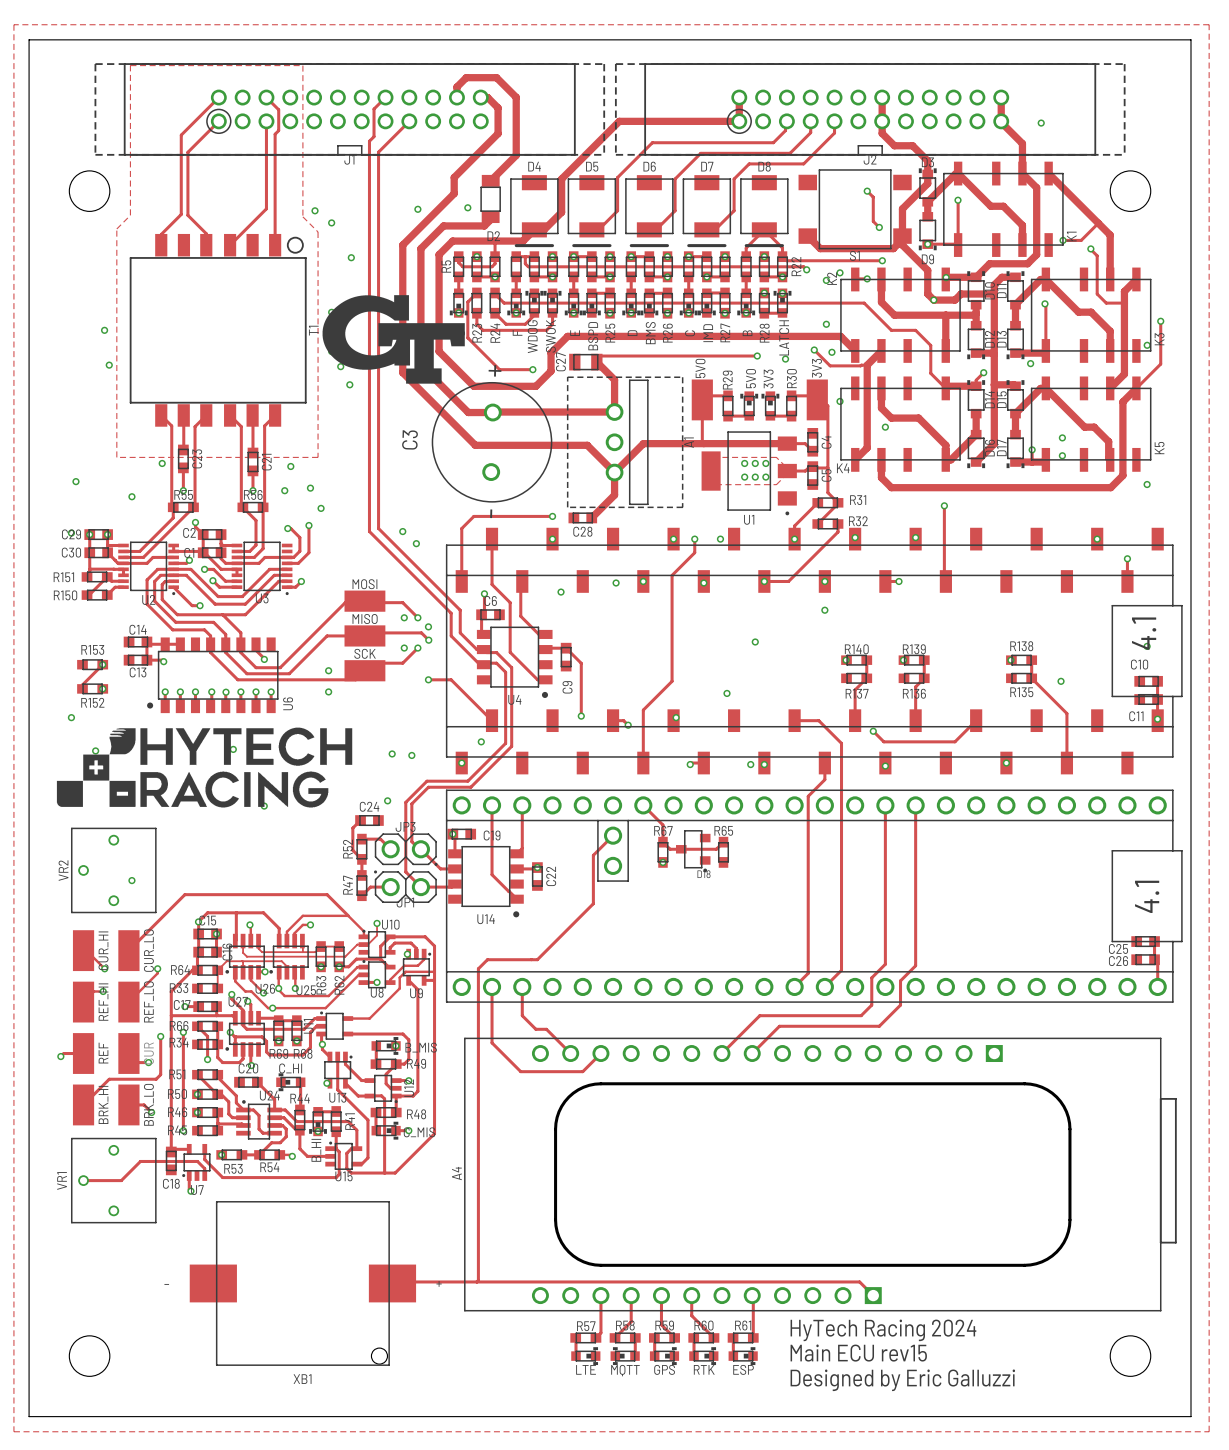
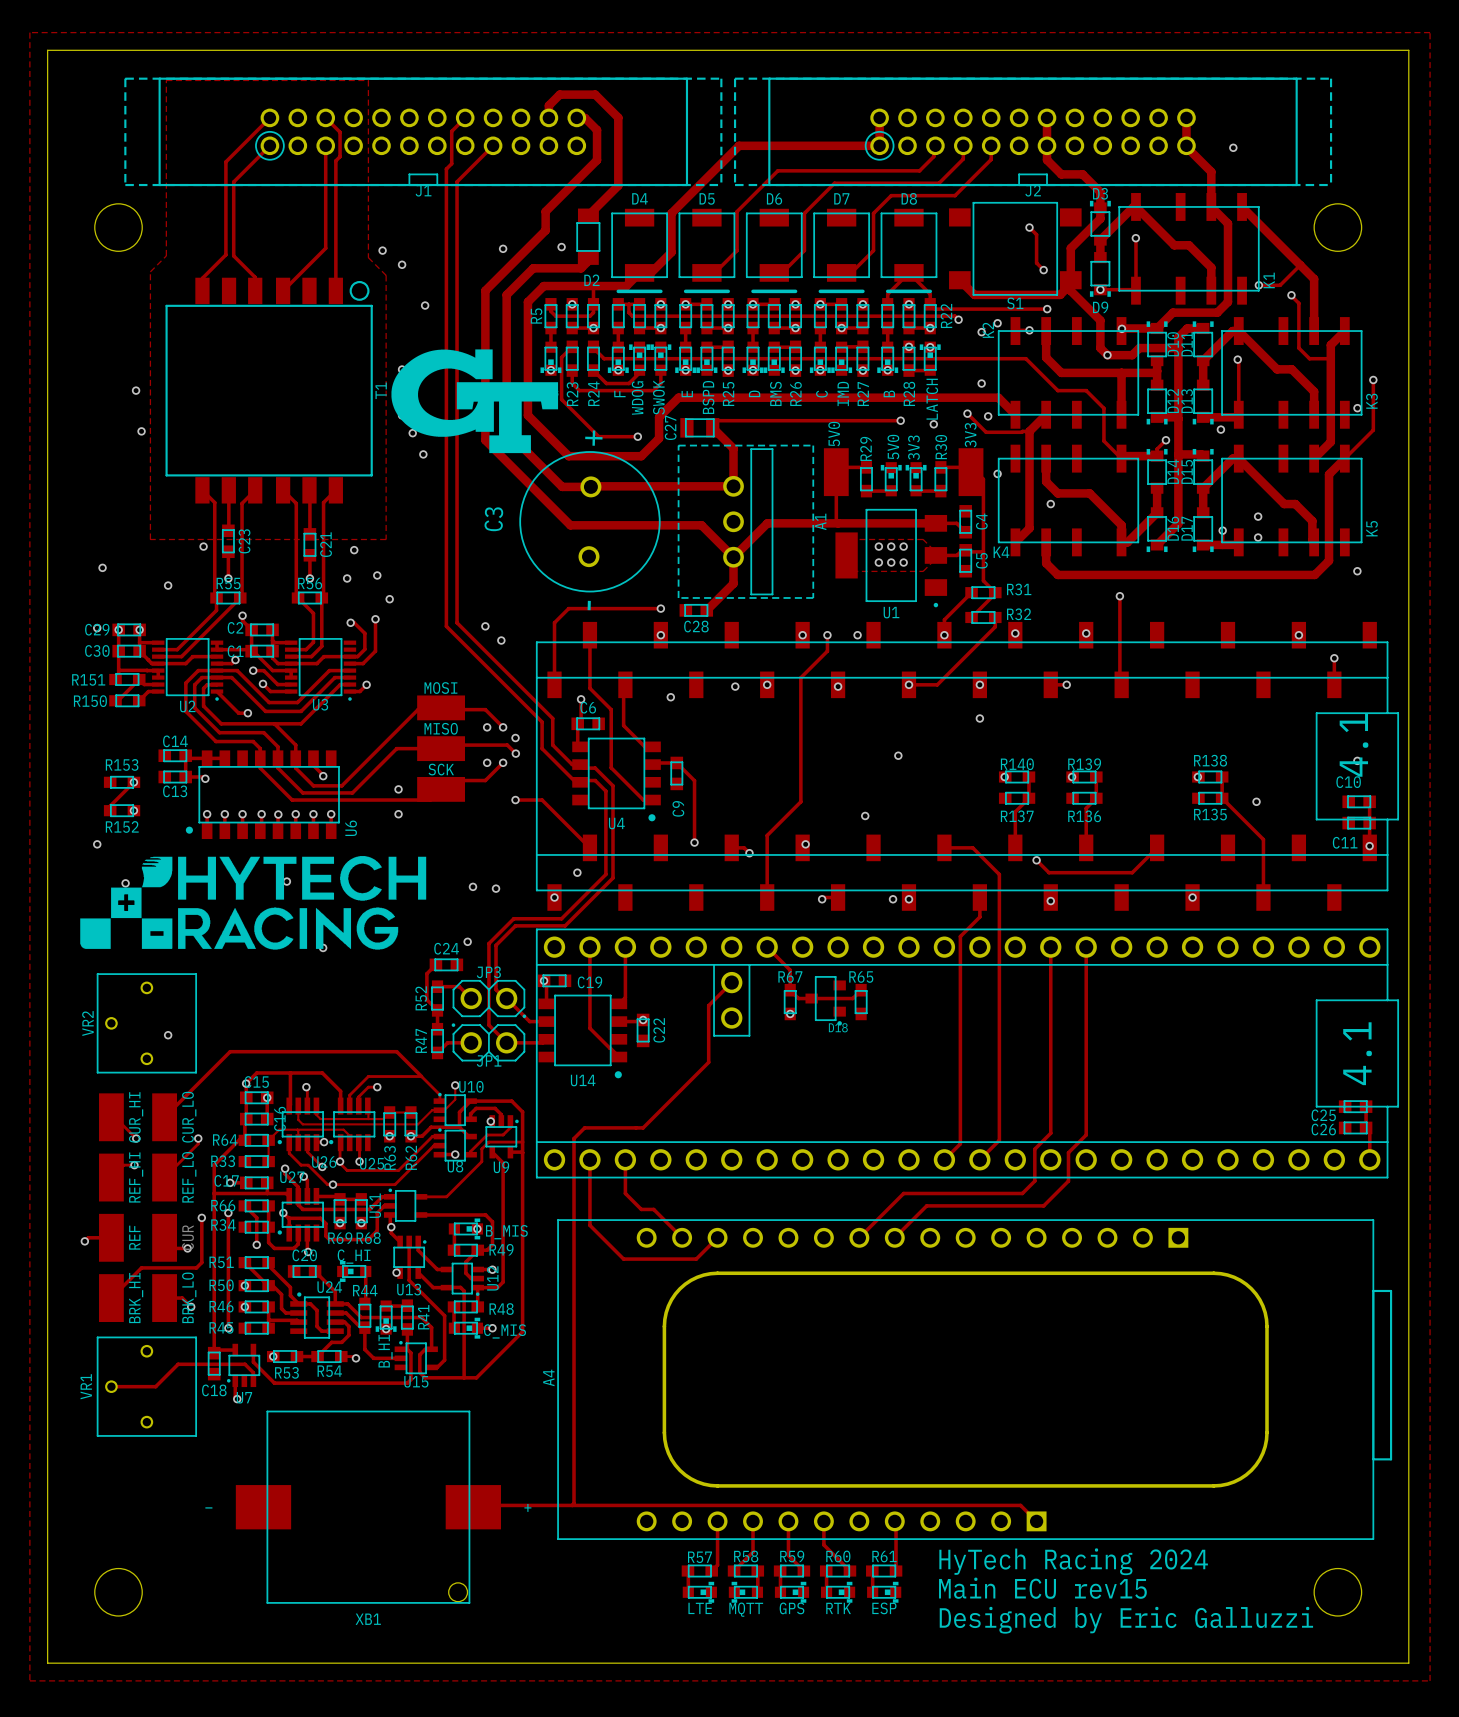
via: none -> (878, 546)
via: (744, 463) -> none
via: none -> (891, 546)
via: (755, 463) -> none
via: none -> (903, 546)
via: (765, 463) -> none
via: none -> (878, 562)
via: (744, 477) -> none
via: none -> (891, 562)
via: (755, 477) -> none
via: none -> (903, 562)
via: (765, 477) -> none

